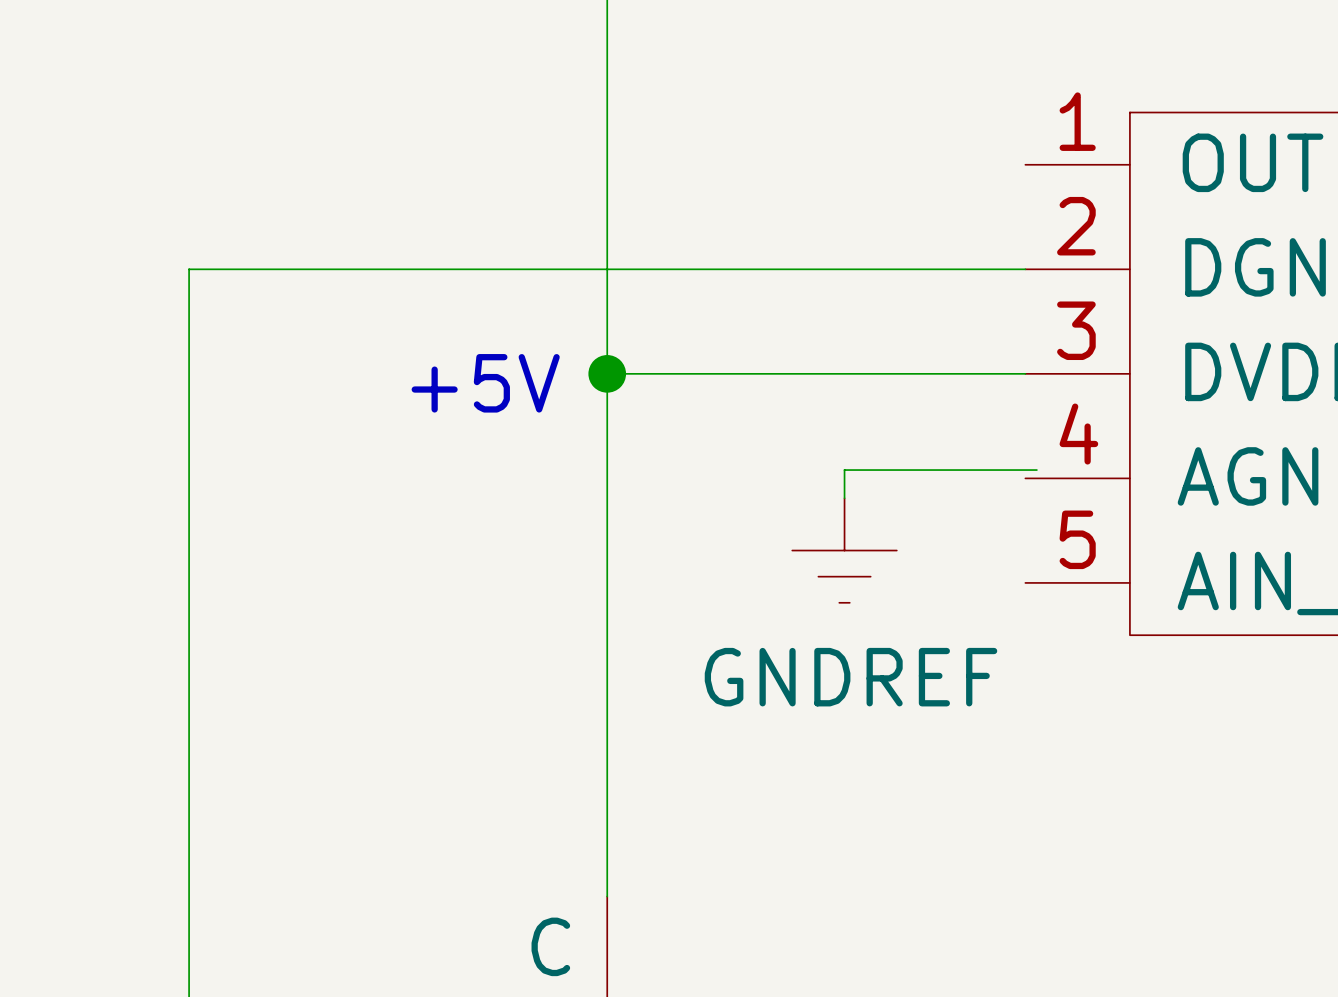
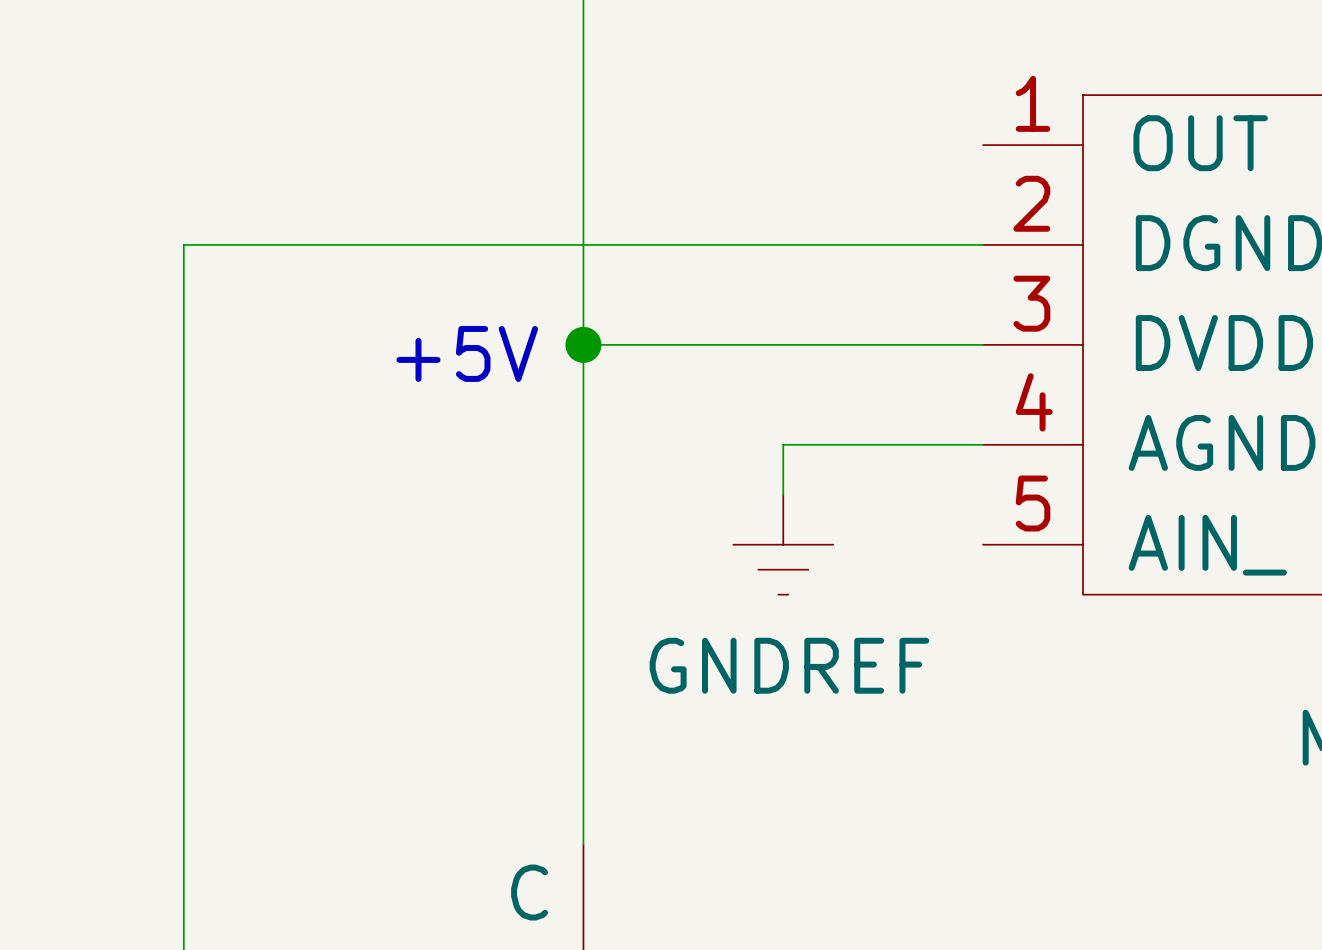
wire: (1036, 470) (844, 470) (844, 498) -> none
wire: none -> (983, 444) (783, 444) (783, 494)
power symbol position: GNDREF (844, 550) -> GNDREF (783, 544)

